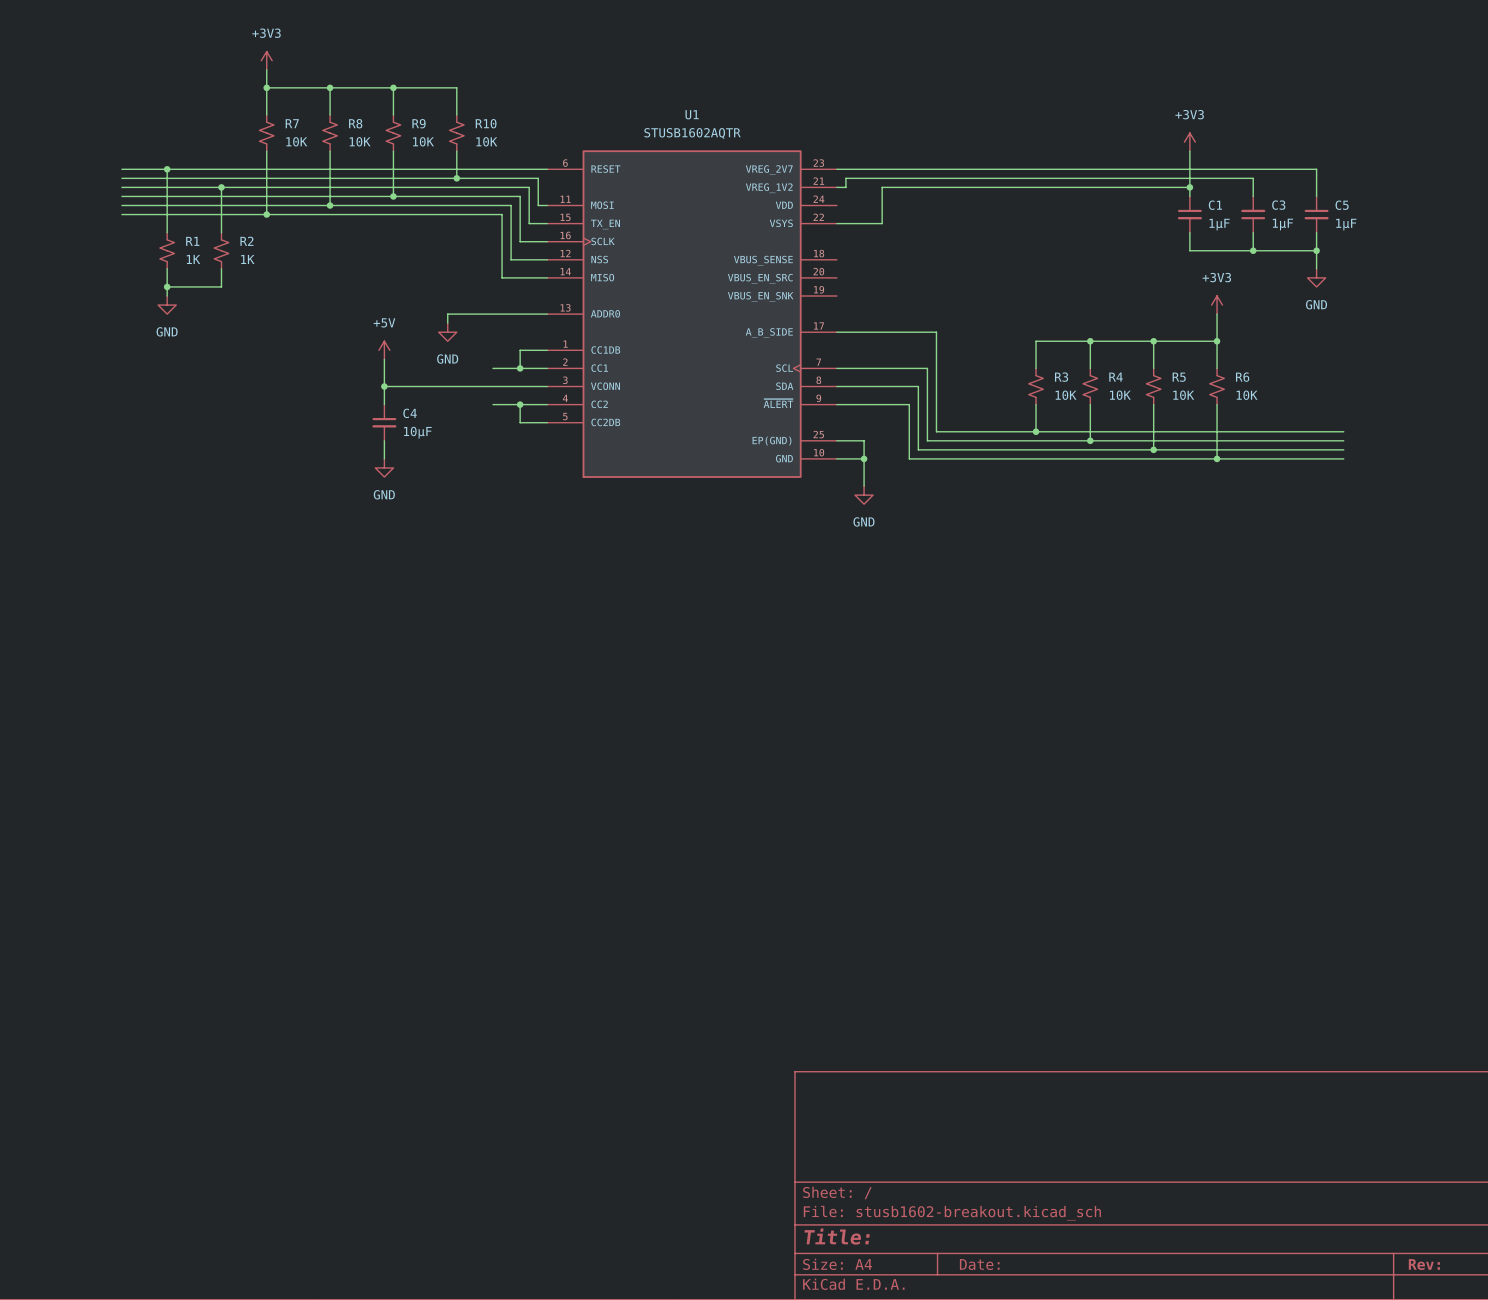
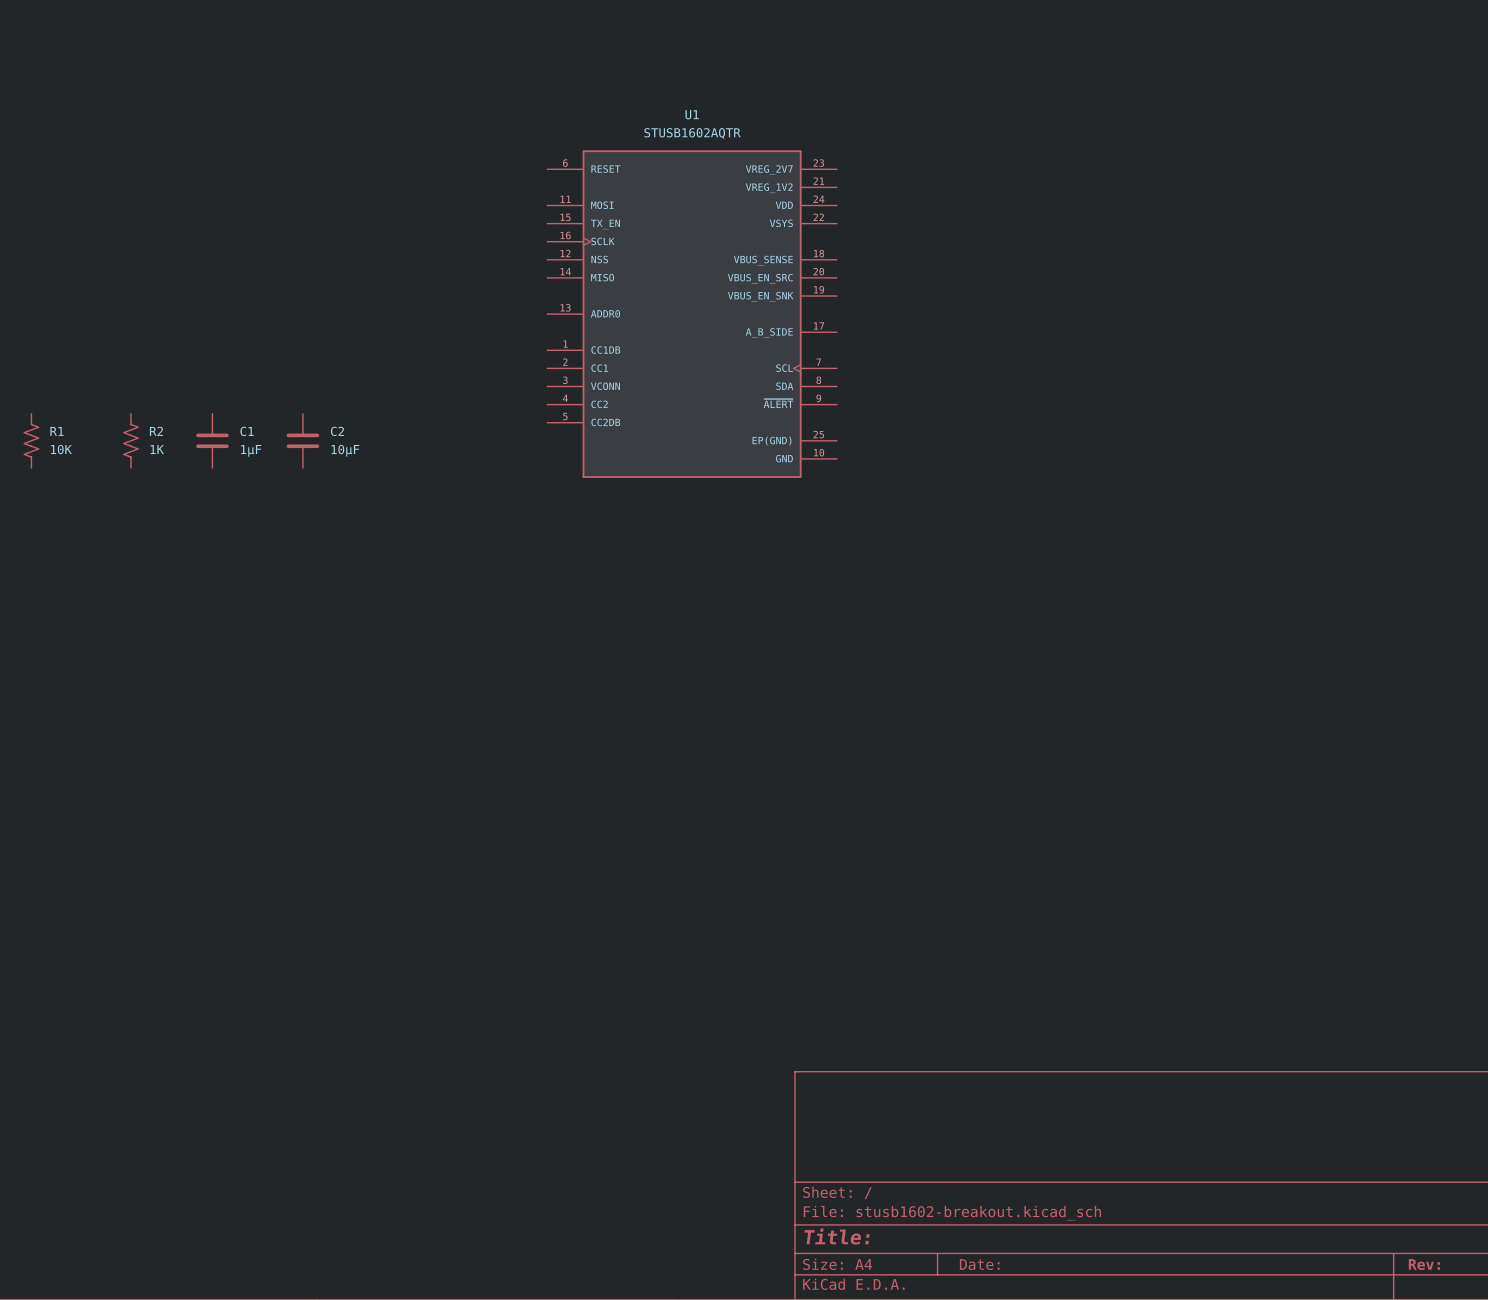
power symbol: +3V3 (266, 60) -> none
wire: (266, 69) (266, 114) -> none
wire: (266, 87) (456, 87) (456, 114) -> none
junction: (266, 87) -> none
wire: (330, 87) (330, 114) -> none
junction: (330, 87) -> none
wire: (393, 87) (393, 114) -> none
junction: (393, 87) -> none
R7: 10K (266, 133) -> none
R8: 10K (330, 133) -> none
R9: 10K (393, 133) -> none
R10: 10K (456, 133) -> none
power symbol: +3V3 (1189, 142) -> none
wire: (266, 151) (266, 214) -> none
wire: (330, 151) (330, 205) -> none
wire: (393, 151) (393, 196) -> none
wire: (456, 151) (456, 178) -> none
wire: (1189, 151) (1189, 196) -> none
wire: (121, 169) (547, 169) -> none
wire: (167, 169) (167, 232) -> none
junction: (167, 169) -> none
wire: (836, 169) (1316, 169) (1316, 196) -> none
wire: (121, 178) (538, 178) (538, 205) (547, 205) -> none
junction: (456, 178) -> none
wire: (121, 187) (529, 187) (529, 223) (547, 223) -> none
wire: (221, 187) (221, 232) -> none
junction: (221, 187) -> none
wire: (836, 187) (845, 187) (845, 178) (1253, 178) (1253, 196) -> none
wire: (1189, 187) (882, 187) (882, 223) (836, 223) -> none
junction: (1189, 187) -> none
wire: (121, 196) (520, 196) (520, 241) (547, 241) -> none
junction: (393, 196) -> none
C1 symbol: [1177, 196, 1202, 233] -> [196, 413, 229, 468]
wire: (121, 205) (511, 205) (511, 259) (547, 259) -> none
junction: (330, 205) -> none
wire: (121, 214) (502, 214) (502, 277) (547, 277) -> none
junction: (266, 214) -> none
C3: 1μF (1253, 214) -> none
C5: 1μF (1316, 214) -> none
R1 symbol: [159, 232, 175, 269] -> [24, 413, 39, 468]
R2 symbol: [214, 232, 229, 269] -> [123, 413, 139, 468]
wire: (1189, 232) (1189, 250) (1316, 250) -> none
wire: (1253, 232) (1253, 250) -> none
wire: (1316, 232) (1316, 268) -> none
junction: (1253, 250) -> none
junction: (1316, 250) -> none
R1 value: 1K (193, 259) -> 10K (61, 449)
wire: (167, 268) (167, 296) -> none
wire: (221, 268) (221, 286) (167, 286) -> none
power symbol: GND (1316, 277) -> none
junction: (167, 286) -> none
power symbol: GND (167, 305) -> none
power symbol: +3V3 (1217, 305) -> none
wire: (547, 314) (447, 314) (447, 323) -> none
wire: (1217, 314) (1217, 368) -> none
power symbol: GND (447, 332) -> none
wire: (836, 332) (936, 332) (936, 431) (1343, 431) -> none
wire: (1090, 341) (1090, 368) -> none
junction: (1090, 341) -> none
wire: (1153, 341) (1153, 368) -> none
junction: (1153, 341) -> none
wire: (1217, 341) (1036, 341) (1036, 368) -> none
junction: (1217, 341) -> none
power symbol: +5V (384, 350) -> none
wire: (547, 350) (520, 350) (520, 368) -> none
wire: (384, 359) (384, 404) -> none
wire: (492, 368) (547, 368) -> none
junction: (520, 368) -> none
wire: (836, 368) (927, 368) (927, 440) (1343, 440) -> none
wire: (384, 386) (547, 386) -> none
junction: (384, 386) -> none
wire: (836, 386) (918, 386) (918, 449) (1343, 449) -> none
R3: 10K (1036, 386) -> none
R4: 10K (1090, 386) -> none
R5: 10K (1153, 386) -> none
R6: 10K (1217, 386) -> none
wire: (492, 404) (547, 404) -> none
wire: (520, 404) (520, 422) (547, 422) -> none
junction: (520, 404) -> none
wire: (836, 404) (909, 404) (909, 458) (1343, 458) -> none
wire: (1036, 404) (1036, 431) -> none
wire: (1090, 404) (1090, 440) -> none
wire: (1153, 404) (1153, 449) -> none
wire: (1217, 404) (1217, 458) -> none
C4: 10μF (384, 422) -> none
junction: (1036, 431) -> none
C2: none -> 10μF (302, 440)
wire: (384, 440) (384, 458) -> none
wire: (836, 440) (864, 440) (864, 486) -> none
junction: (1090, 440) -> none
junction: (1153, 449) -> none
wire: (836, 458) (864, 458) -> none
junction: (864, 458) -> none
junction: (1217, 458) -> none
power symbol: GND (384, 467) -> none
power symbol: GND (864, 495) -> none

